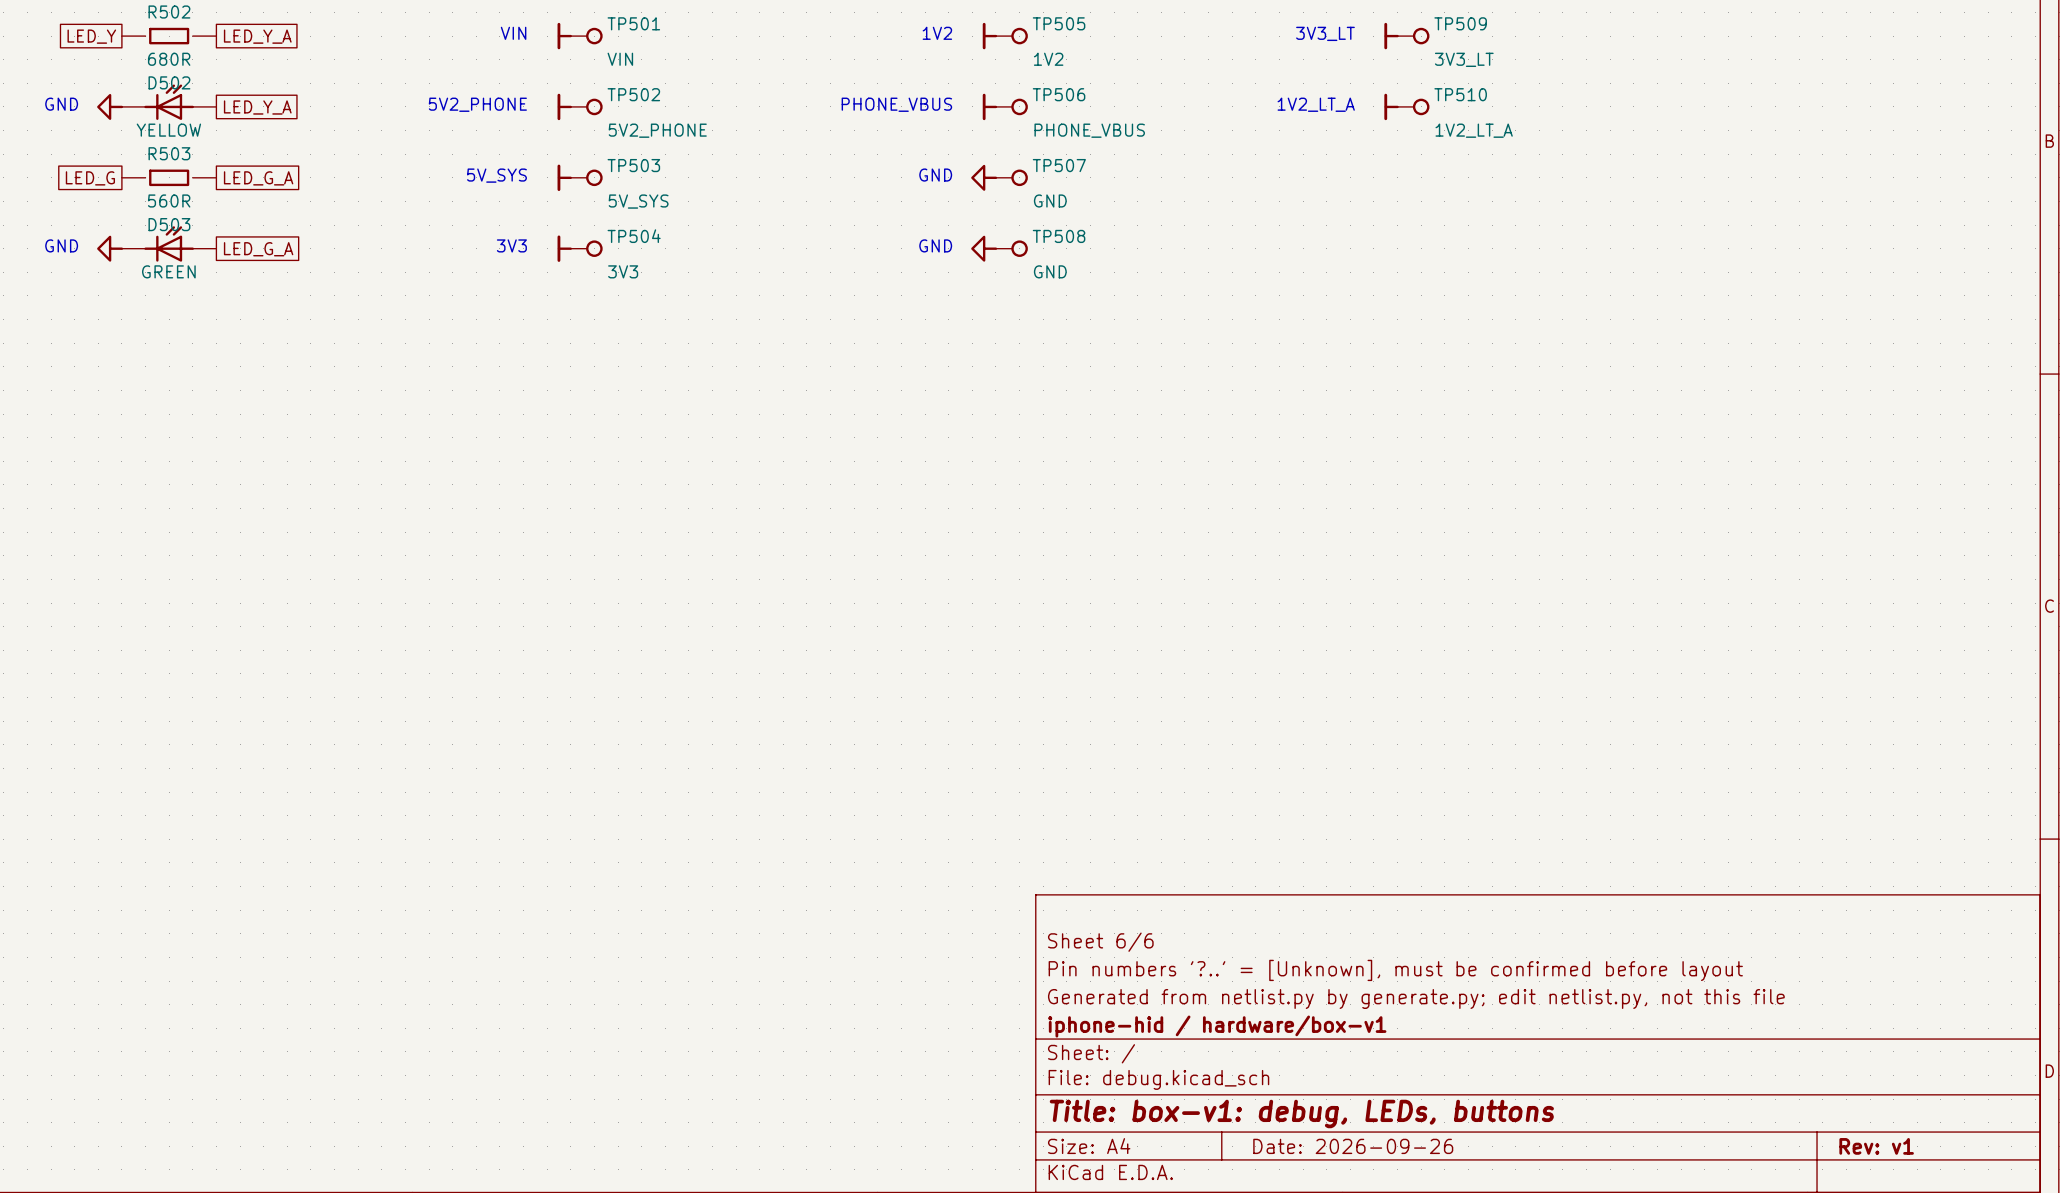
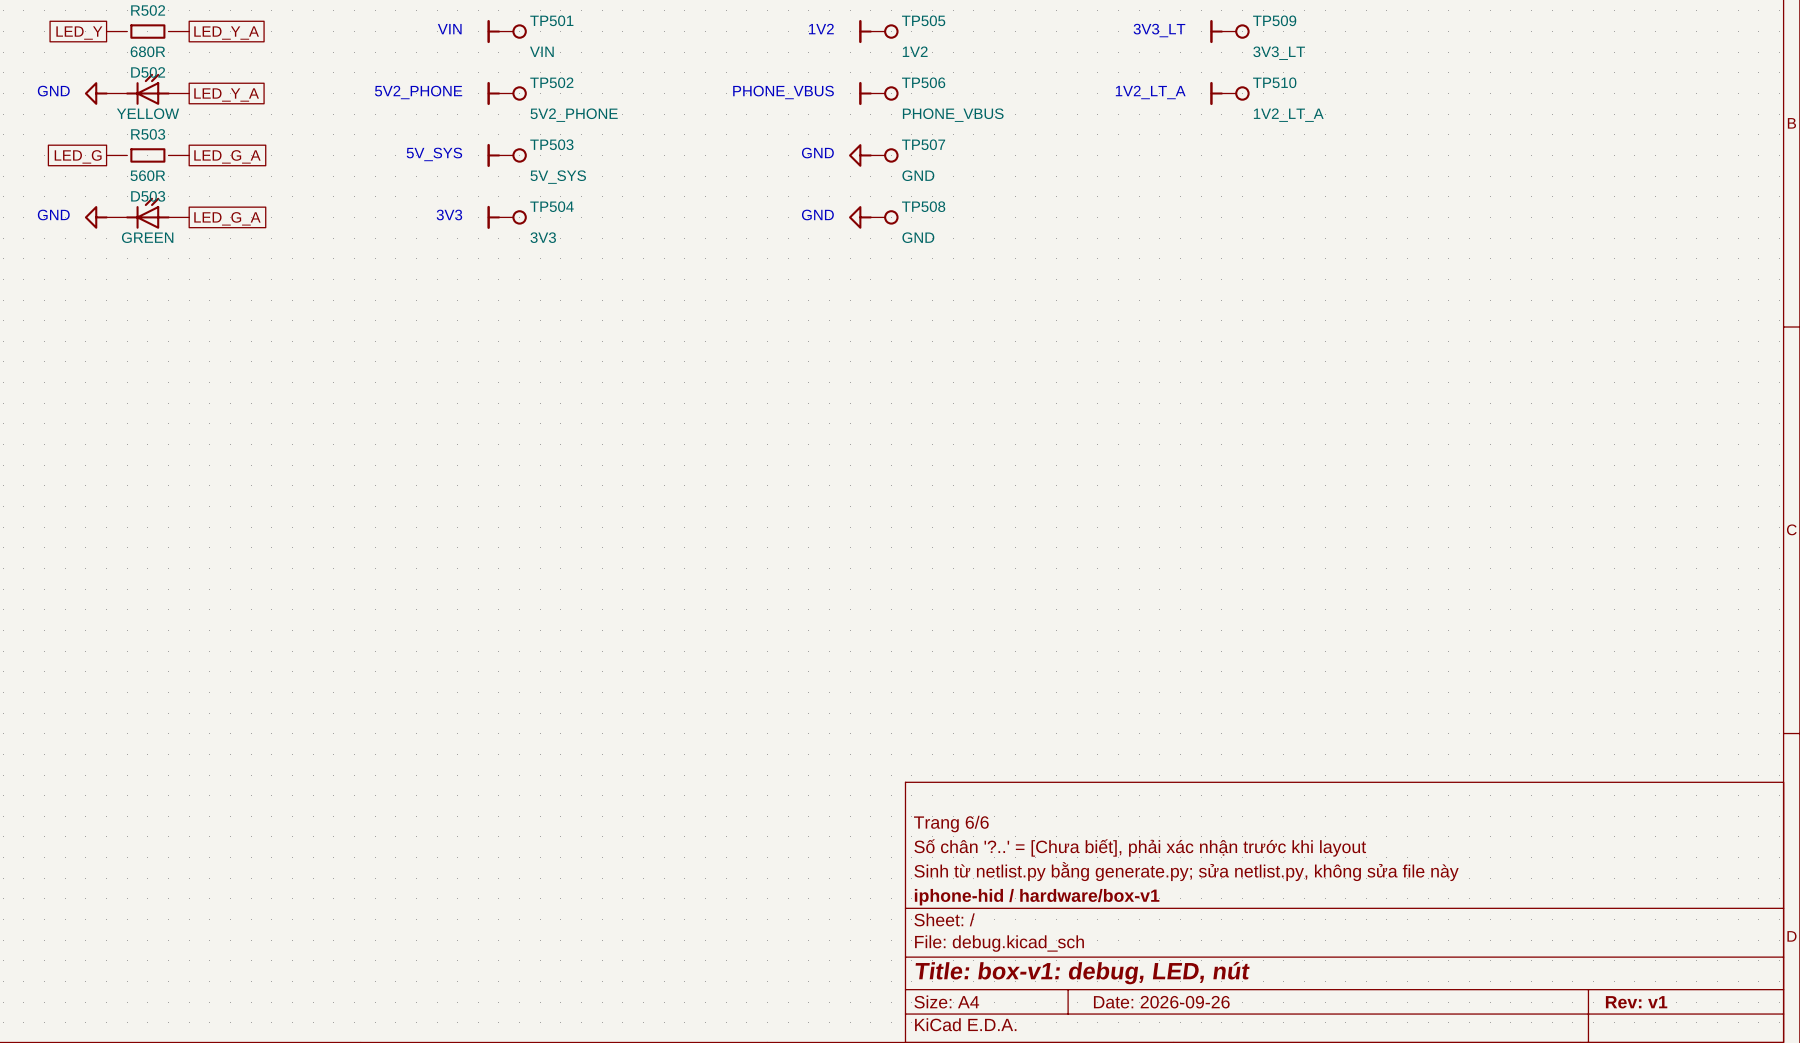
title block: Sheet 6/6 (1100, 942) -> Trang 6/6 (951, 824)
title block: Pin numbers '?..' = [Unknown], must be confirmed before layout (1395, 970) -> Số chân '?..' = [Chưa biết], phải xác nhận trước khi layout (1140, 848)
title block: Generated from netlist.py by generate.py; edit netlist.py, not this file (1416, 998) -> Sinh từ netlist.py bằng generate.py; sửa netlist.py, không sửa file này (1186, 871)
title block: Title: box-v1: debug, LEDs, buttons (1301, 1113) -> Title: box-v1: debug, LED, nút (1082, 973)

